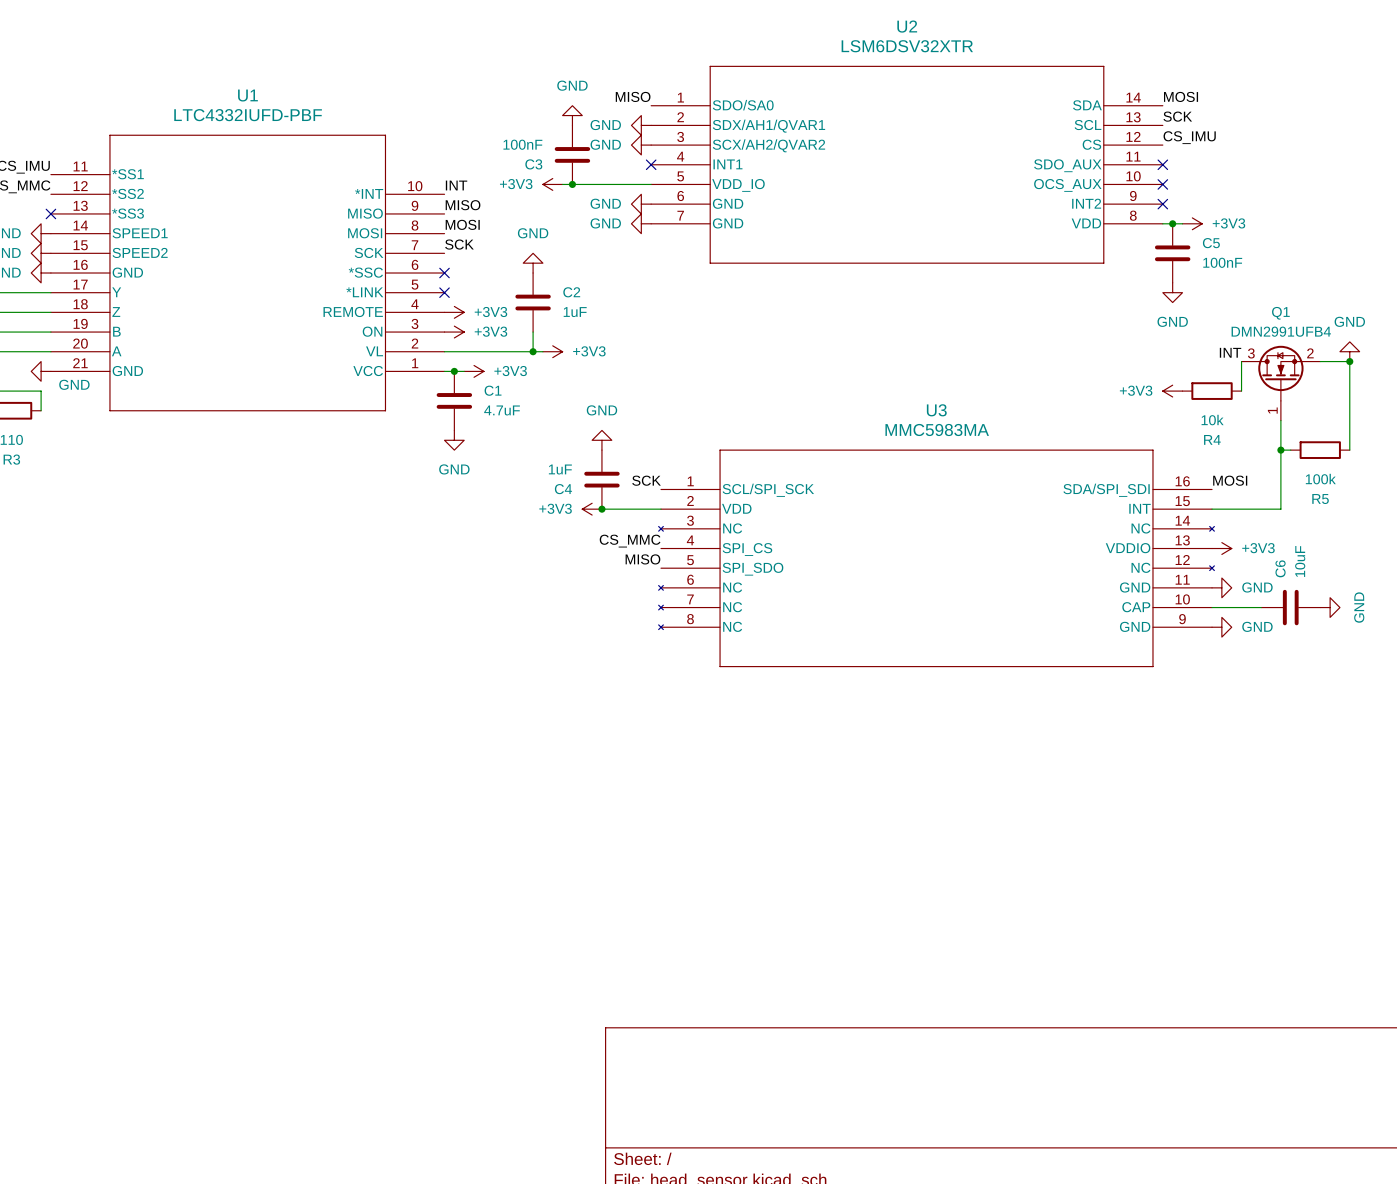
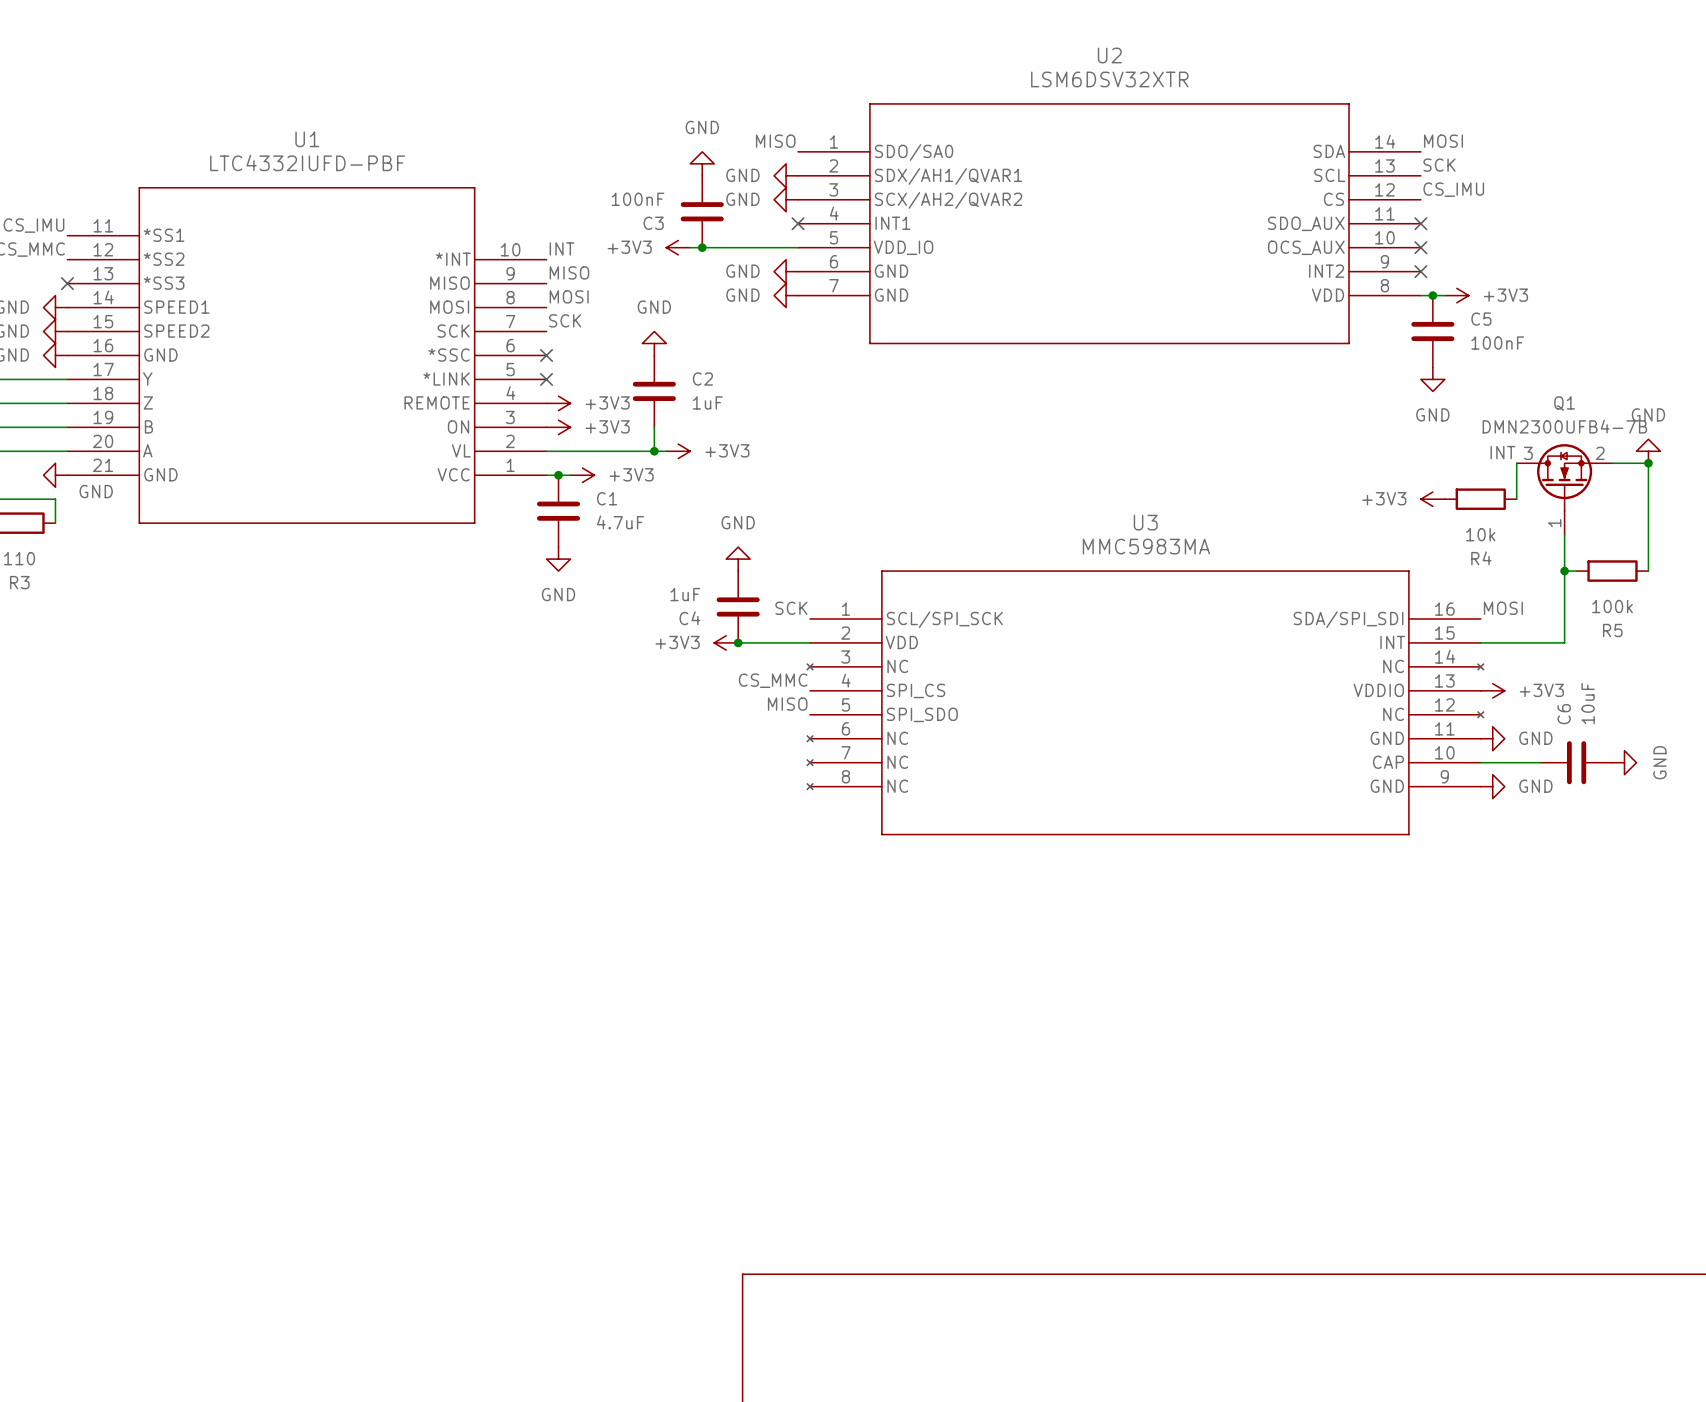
Q1 value: DMN2991UFB4 (1281, 331) -> DMN2300UFB4-7B (1564, 426)

